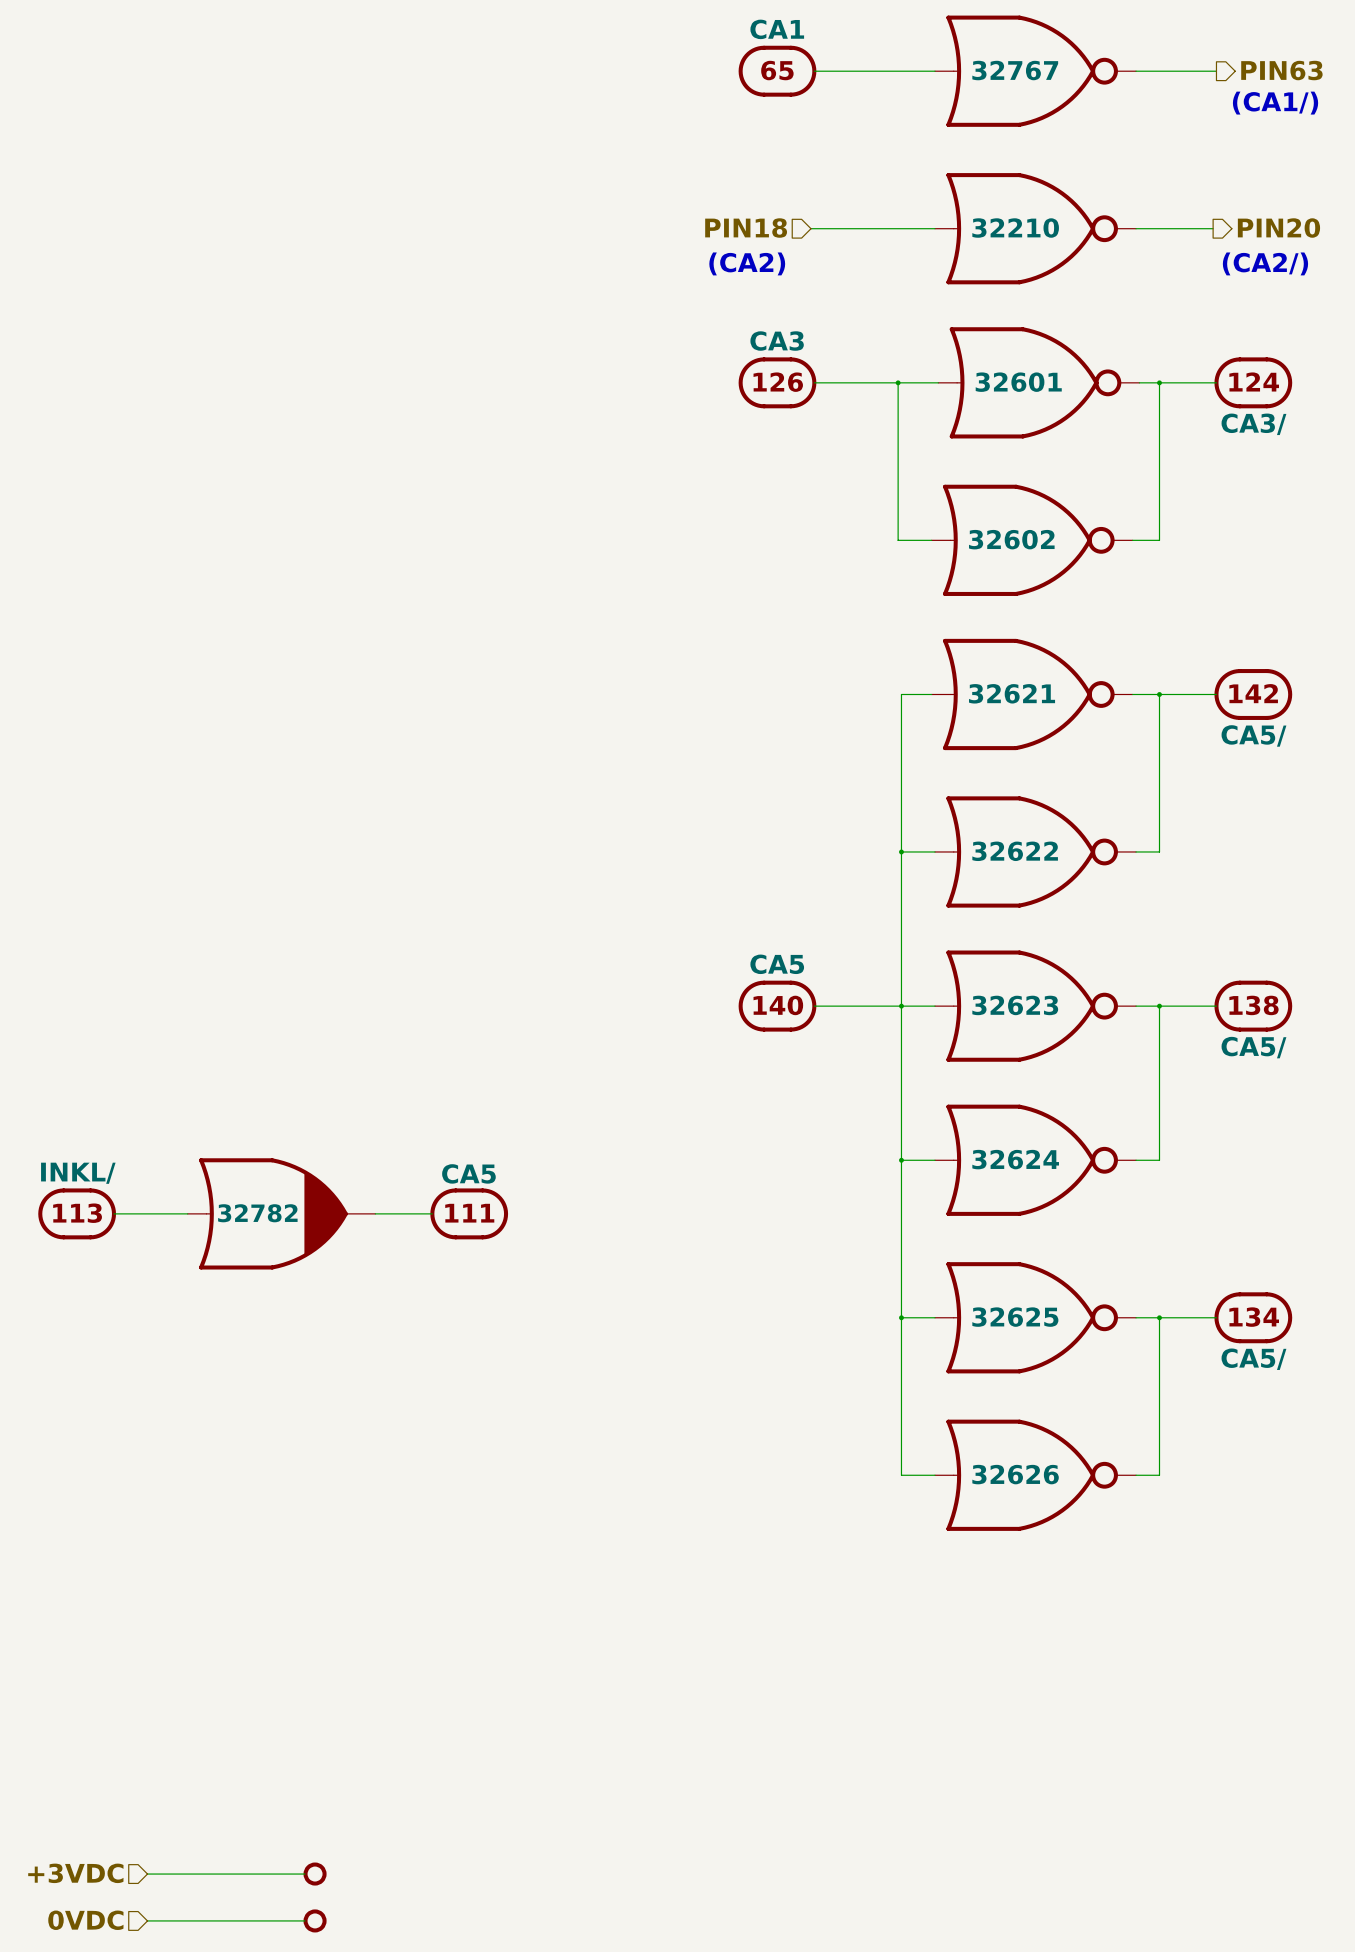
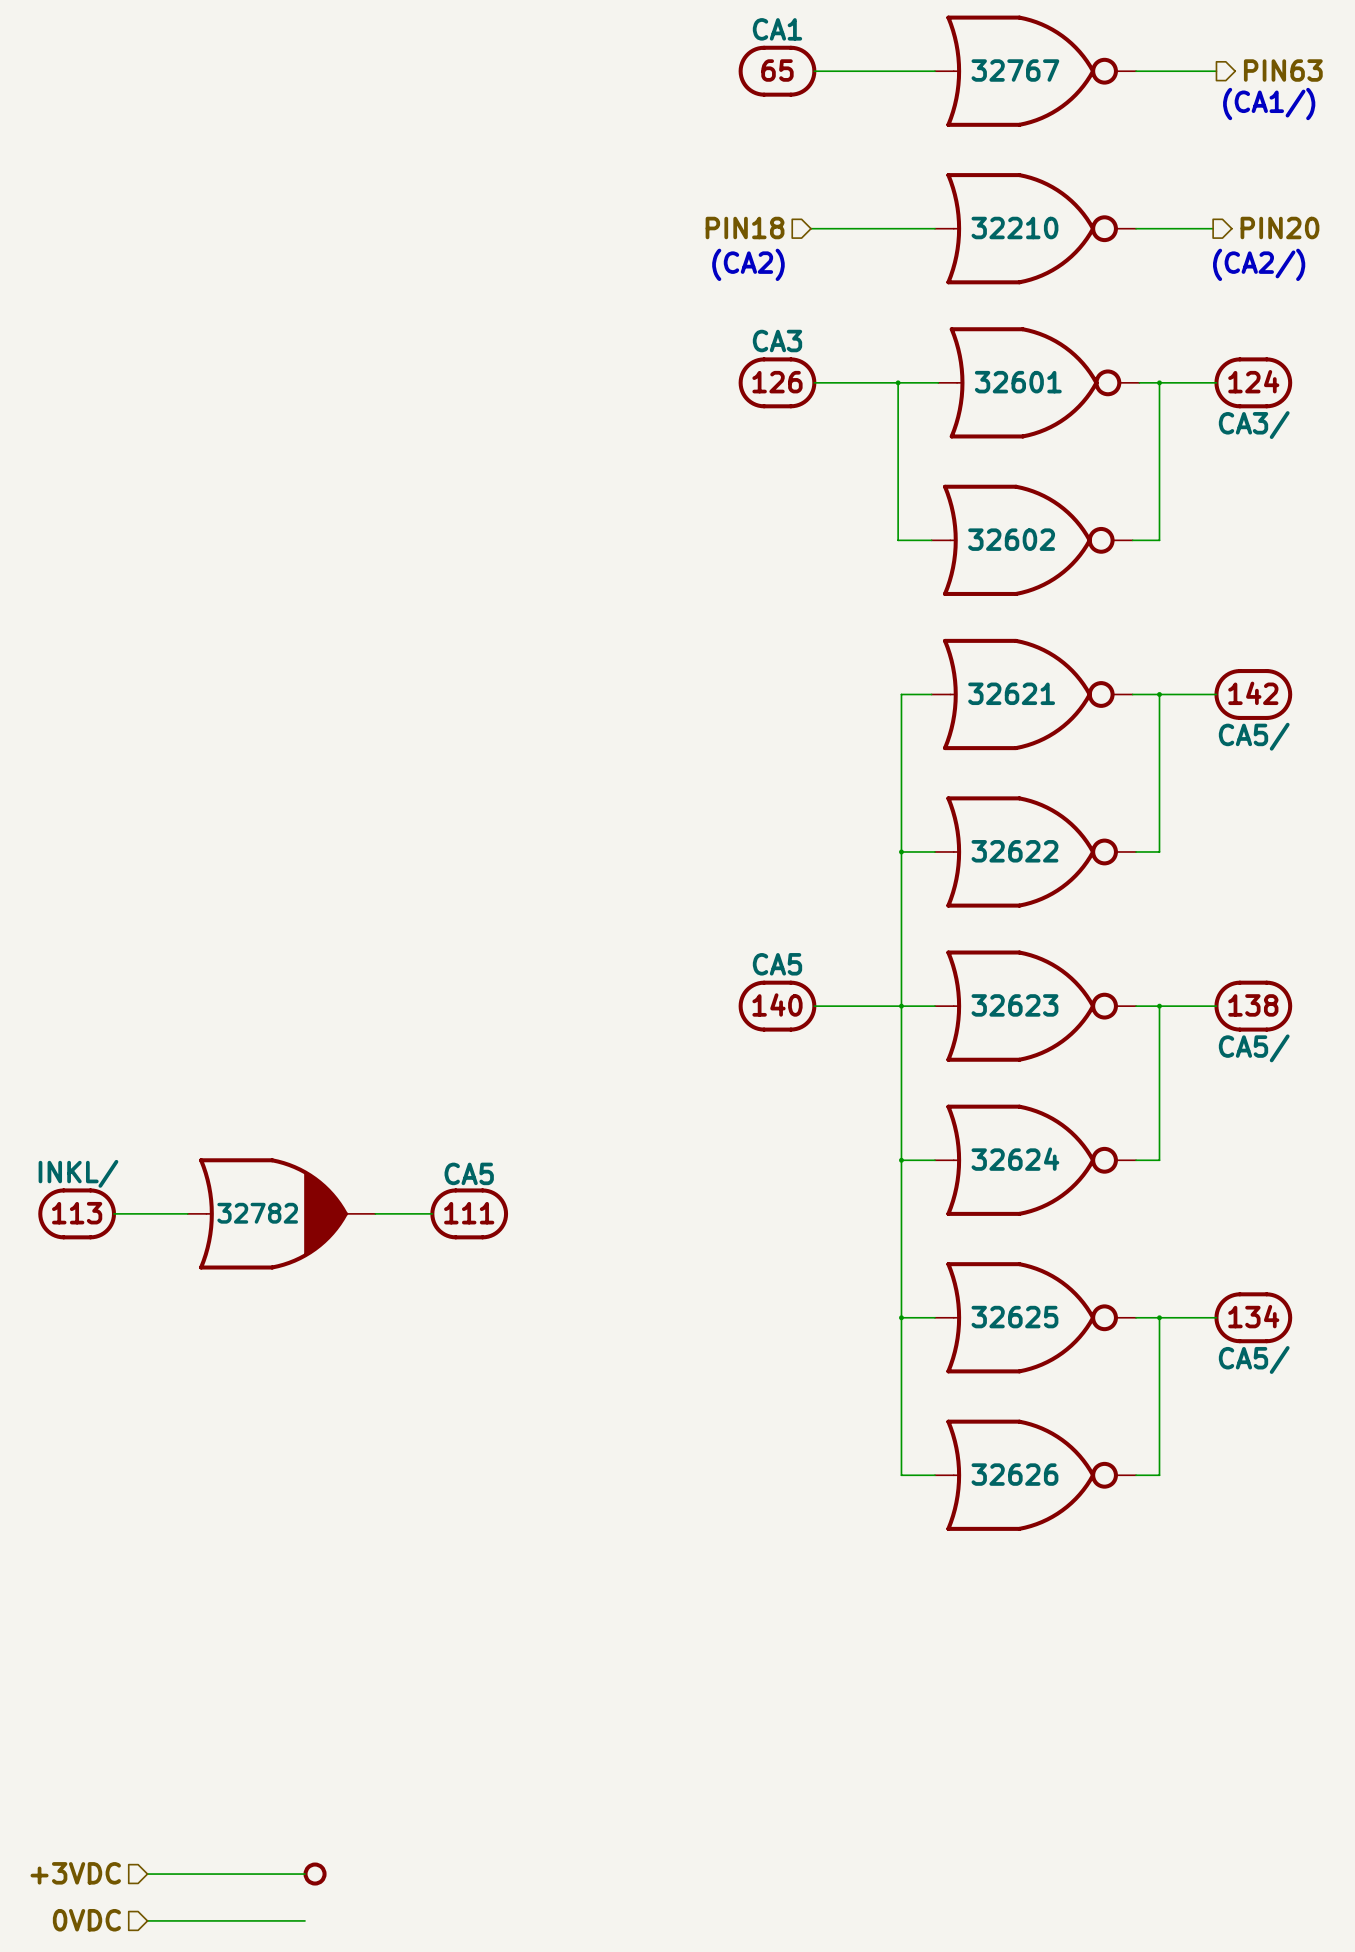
part: (315, 1920) -> none

